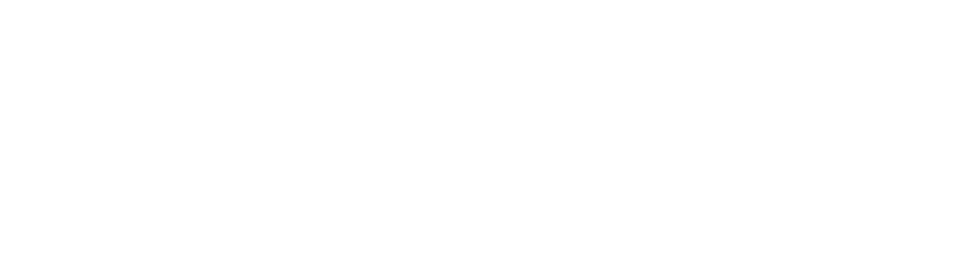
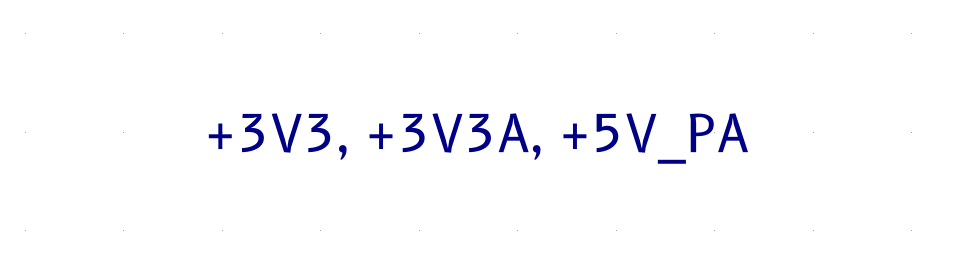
text: none -> +3V3, +3V3A, +5V_PA (478, 138)

